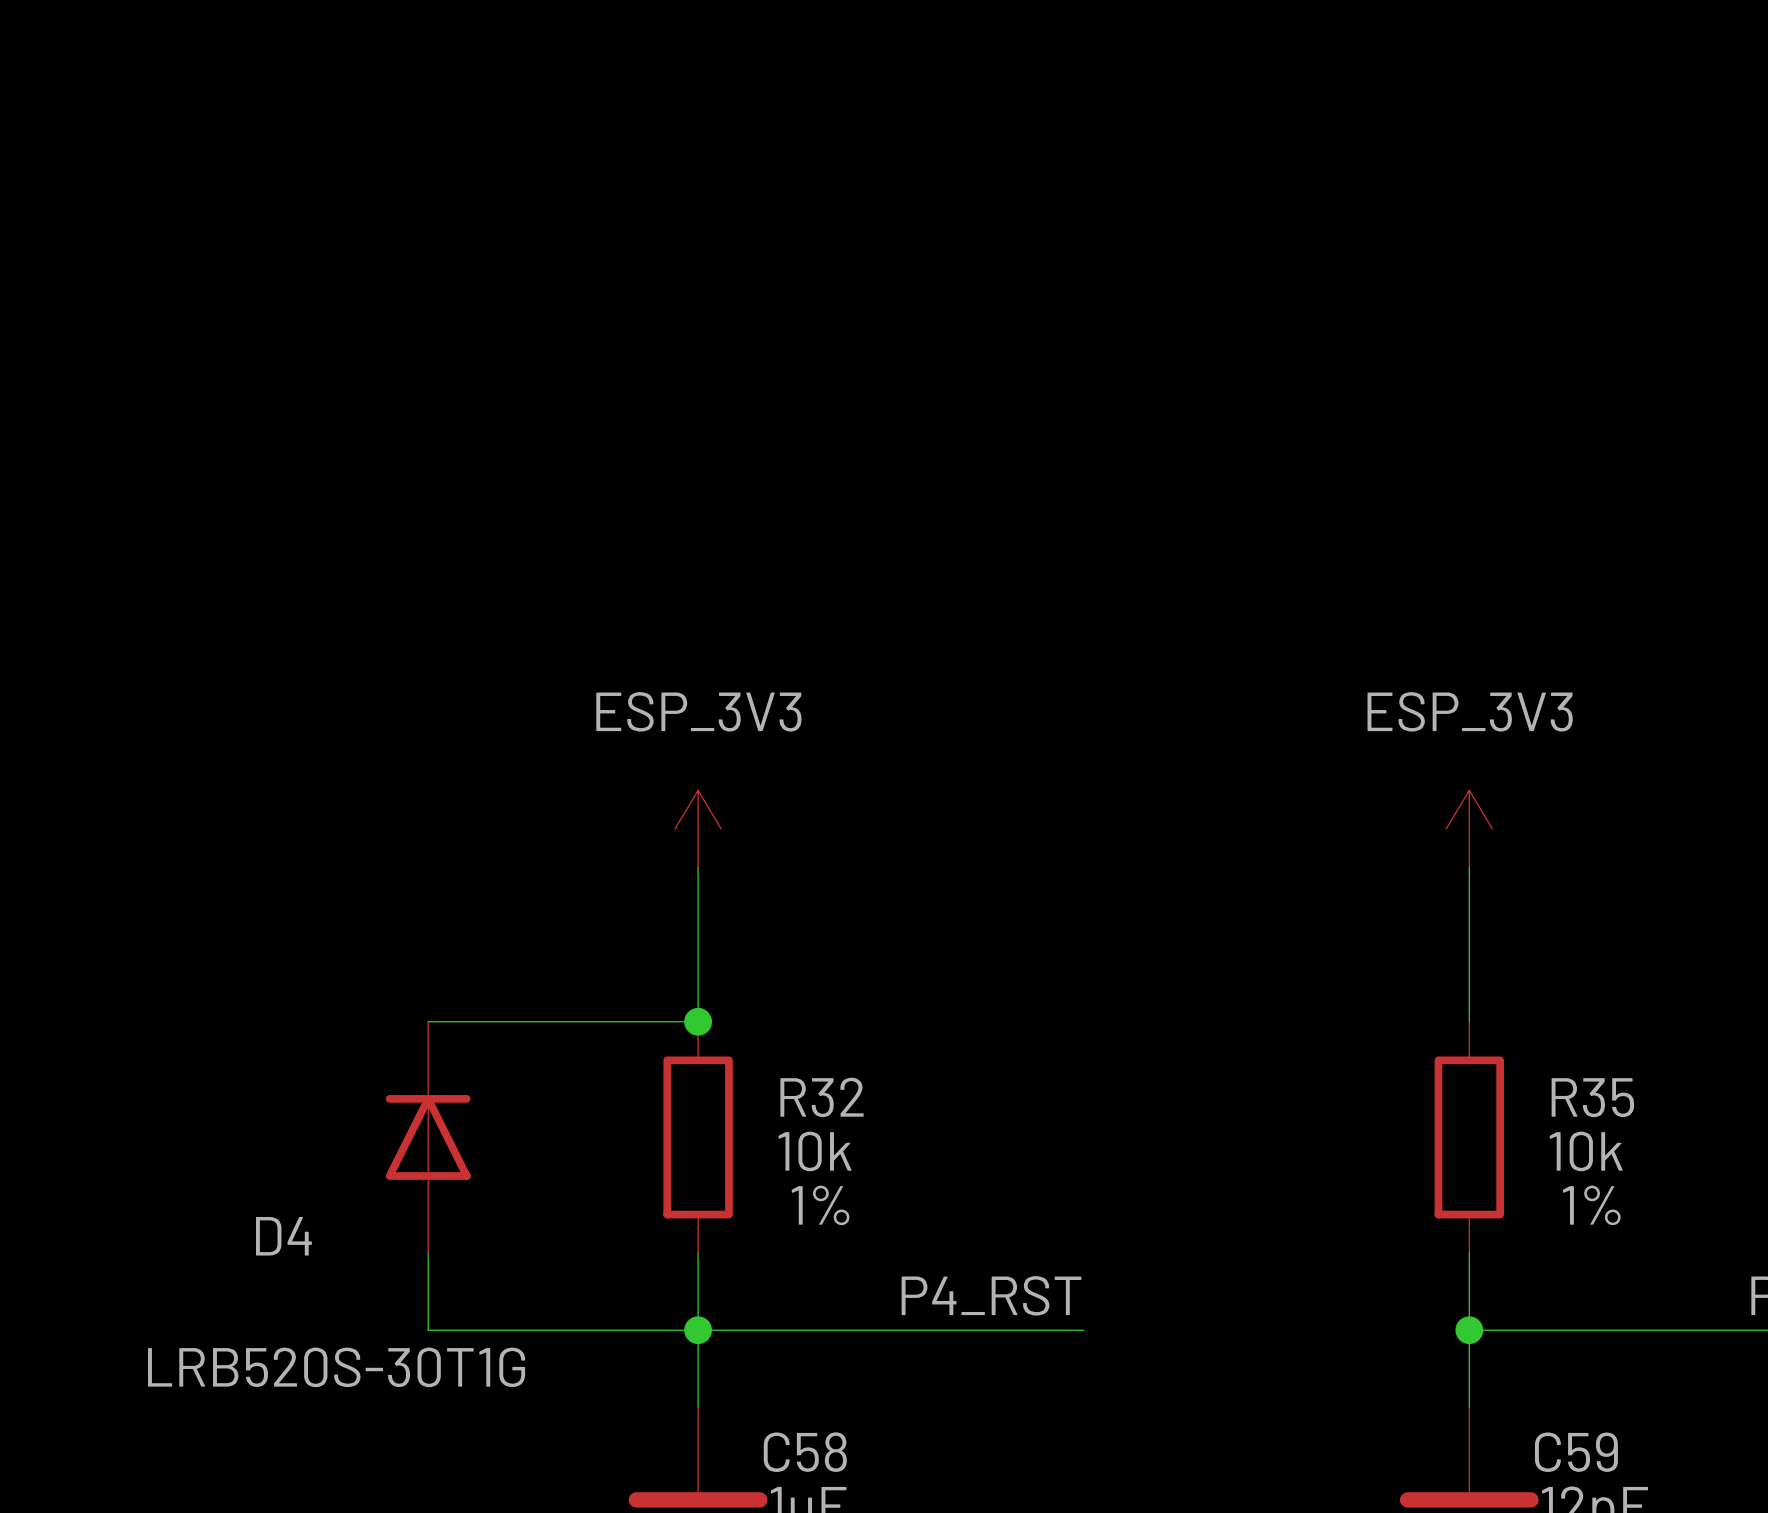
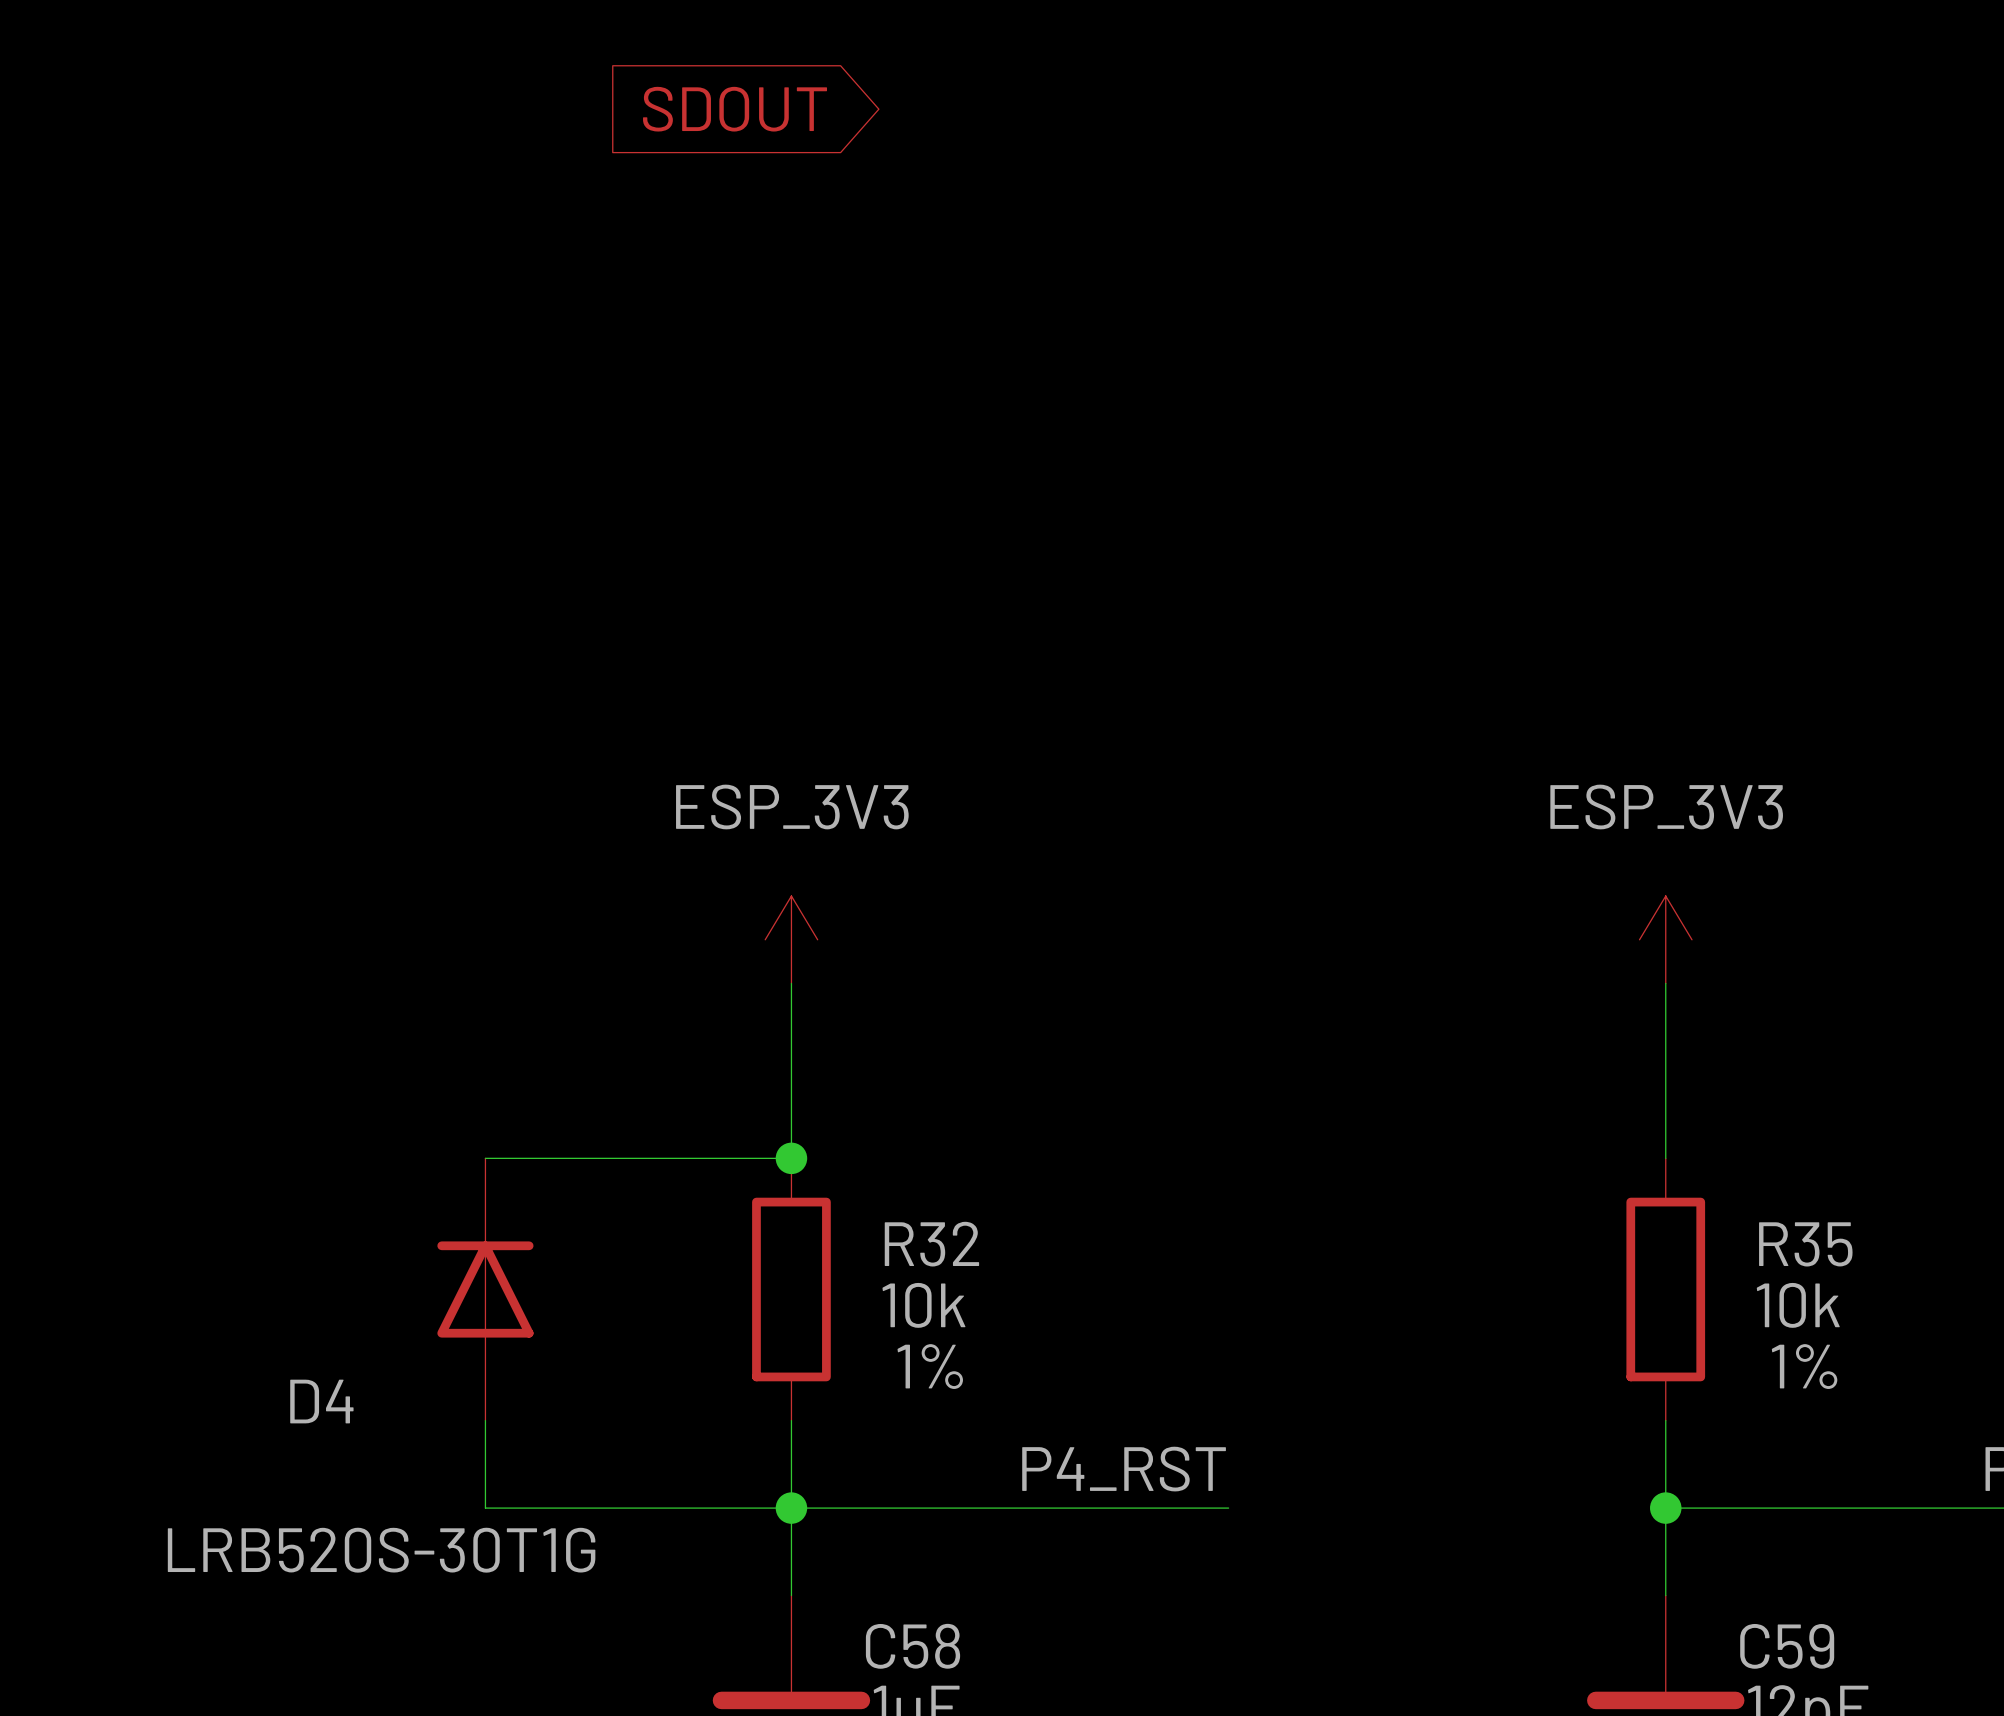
global label: none -> SDOUT (735, 109)

